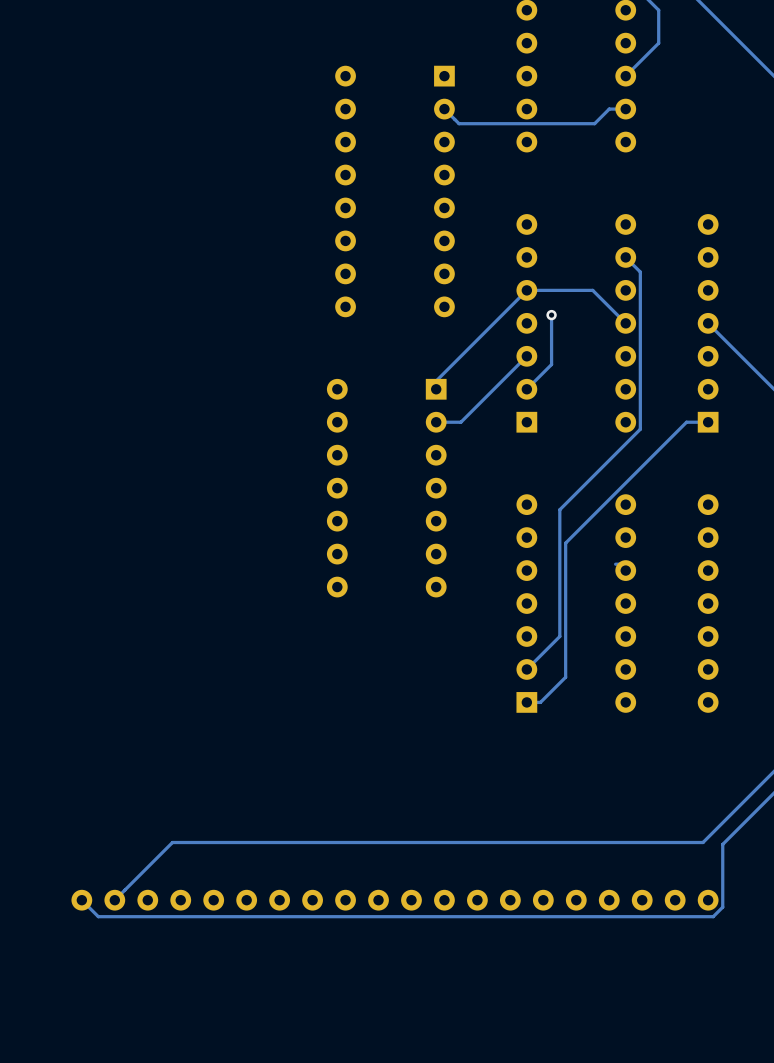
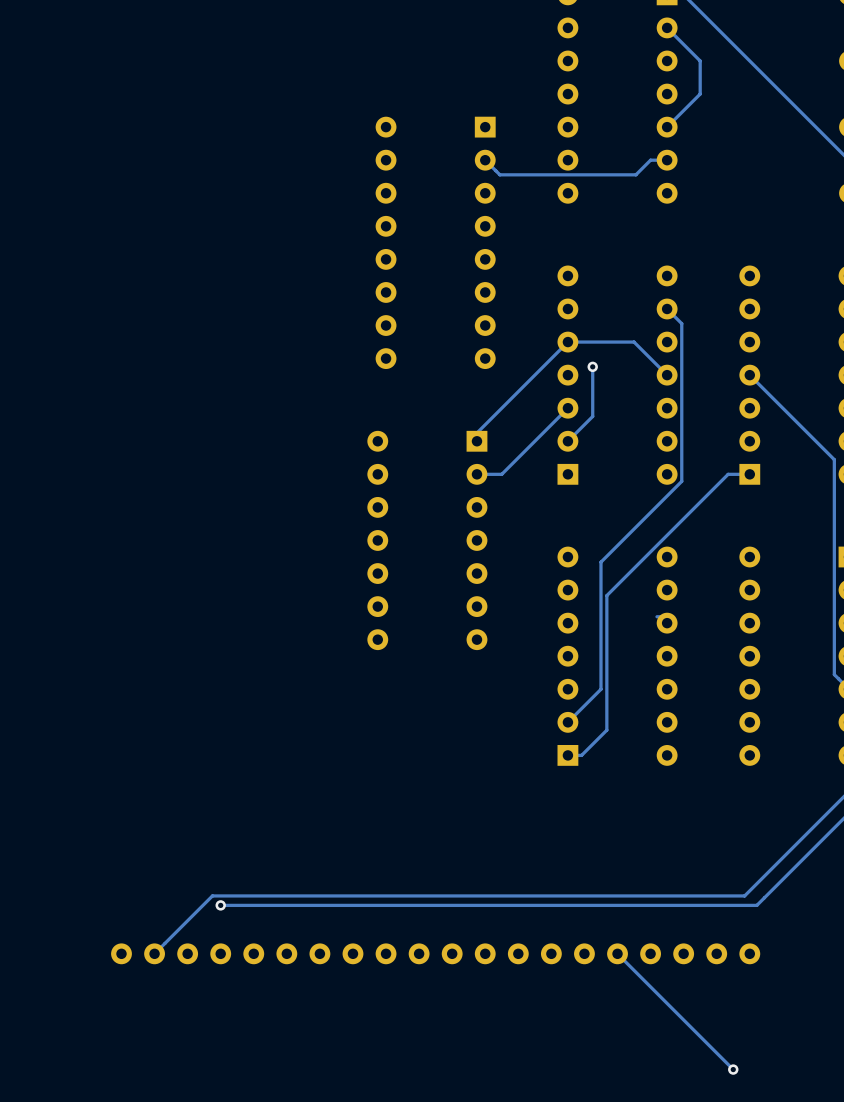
track: (722, 844) (722, 907) (713, 916) (98, 916) (81, 900) -> (764, 897) (756, 905) (220, 905)
via: none -> (220, 905)
track: none -> (617, 953) (733, 1069)
via: none -> (733, 1069)

